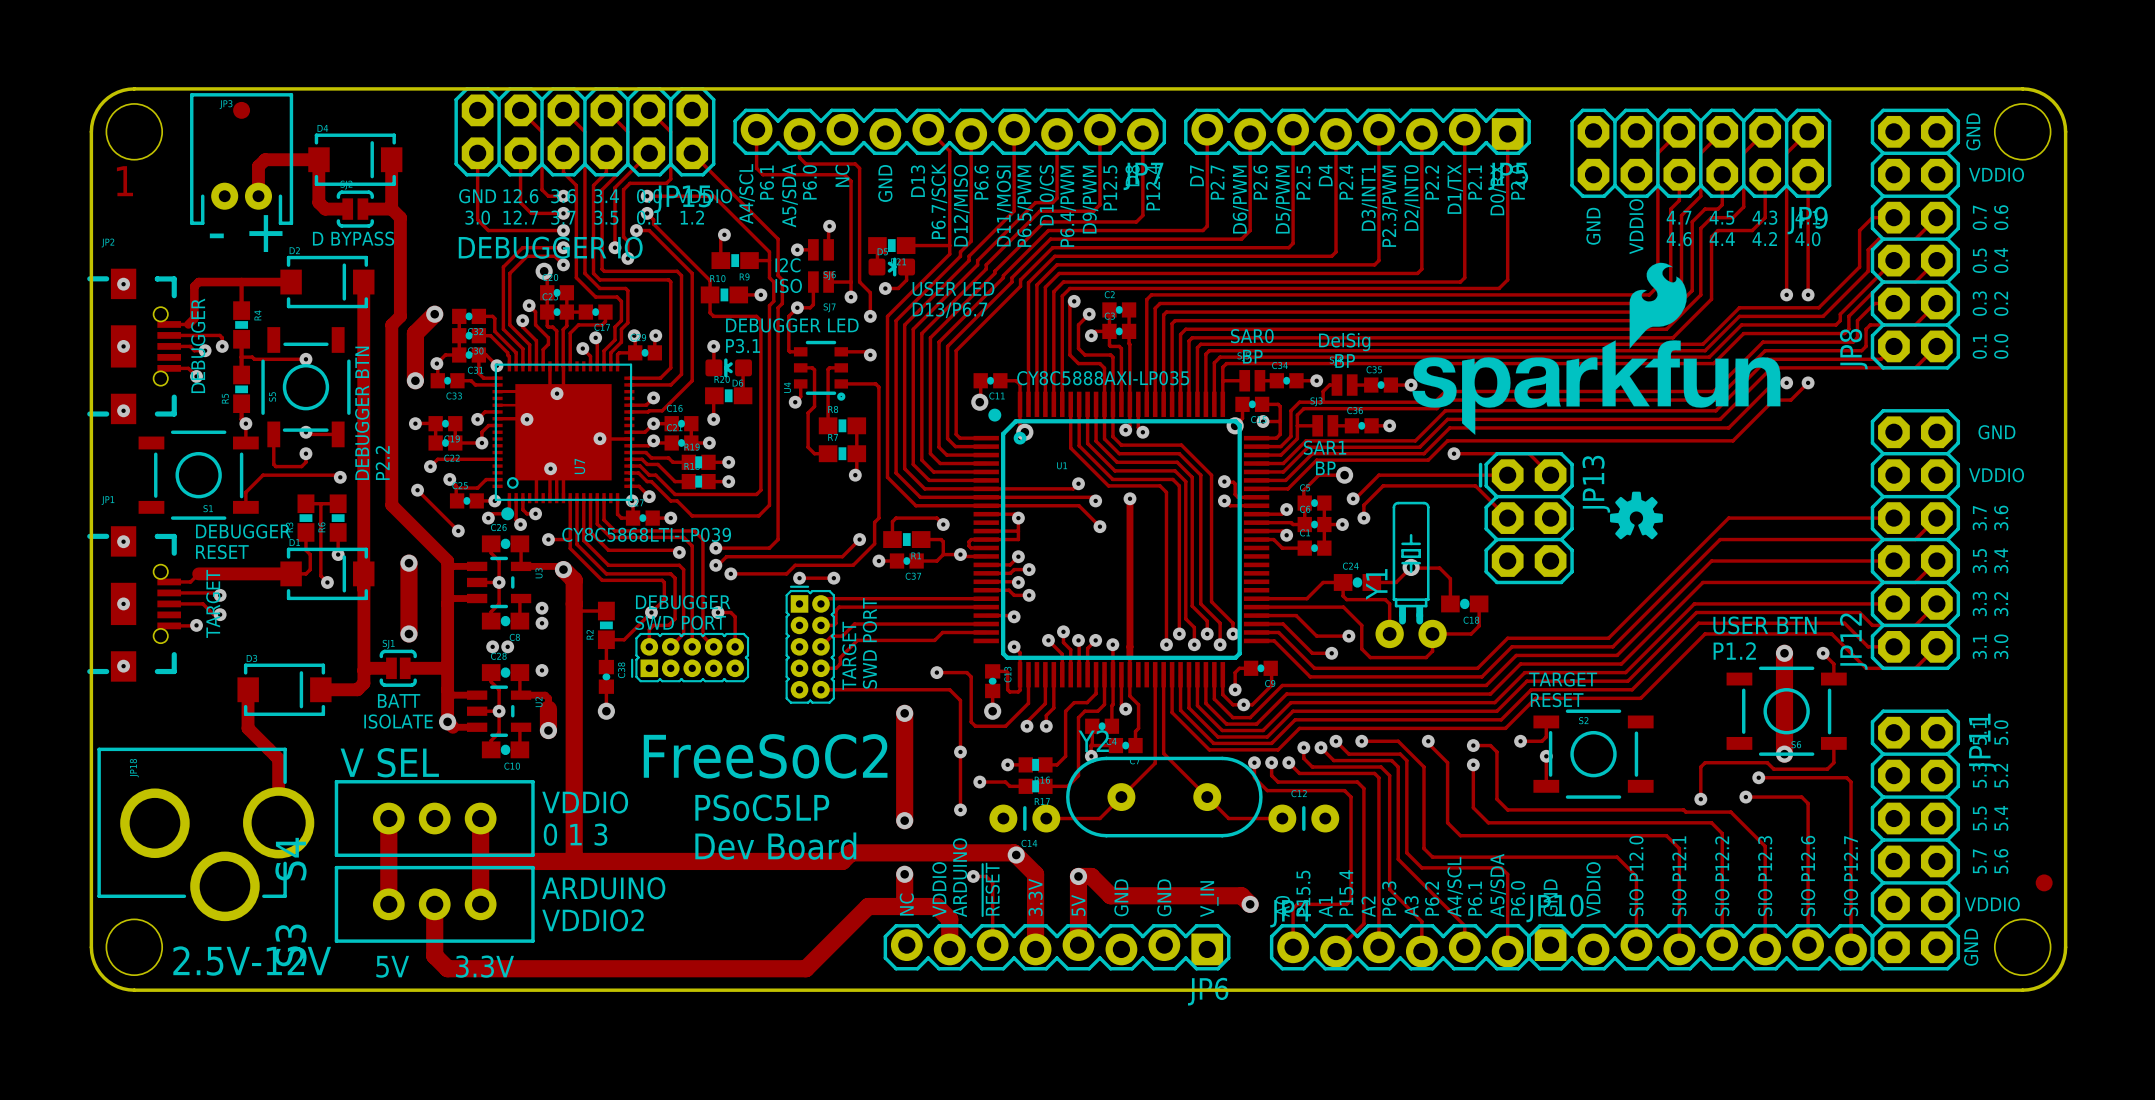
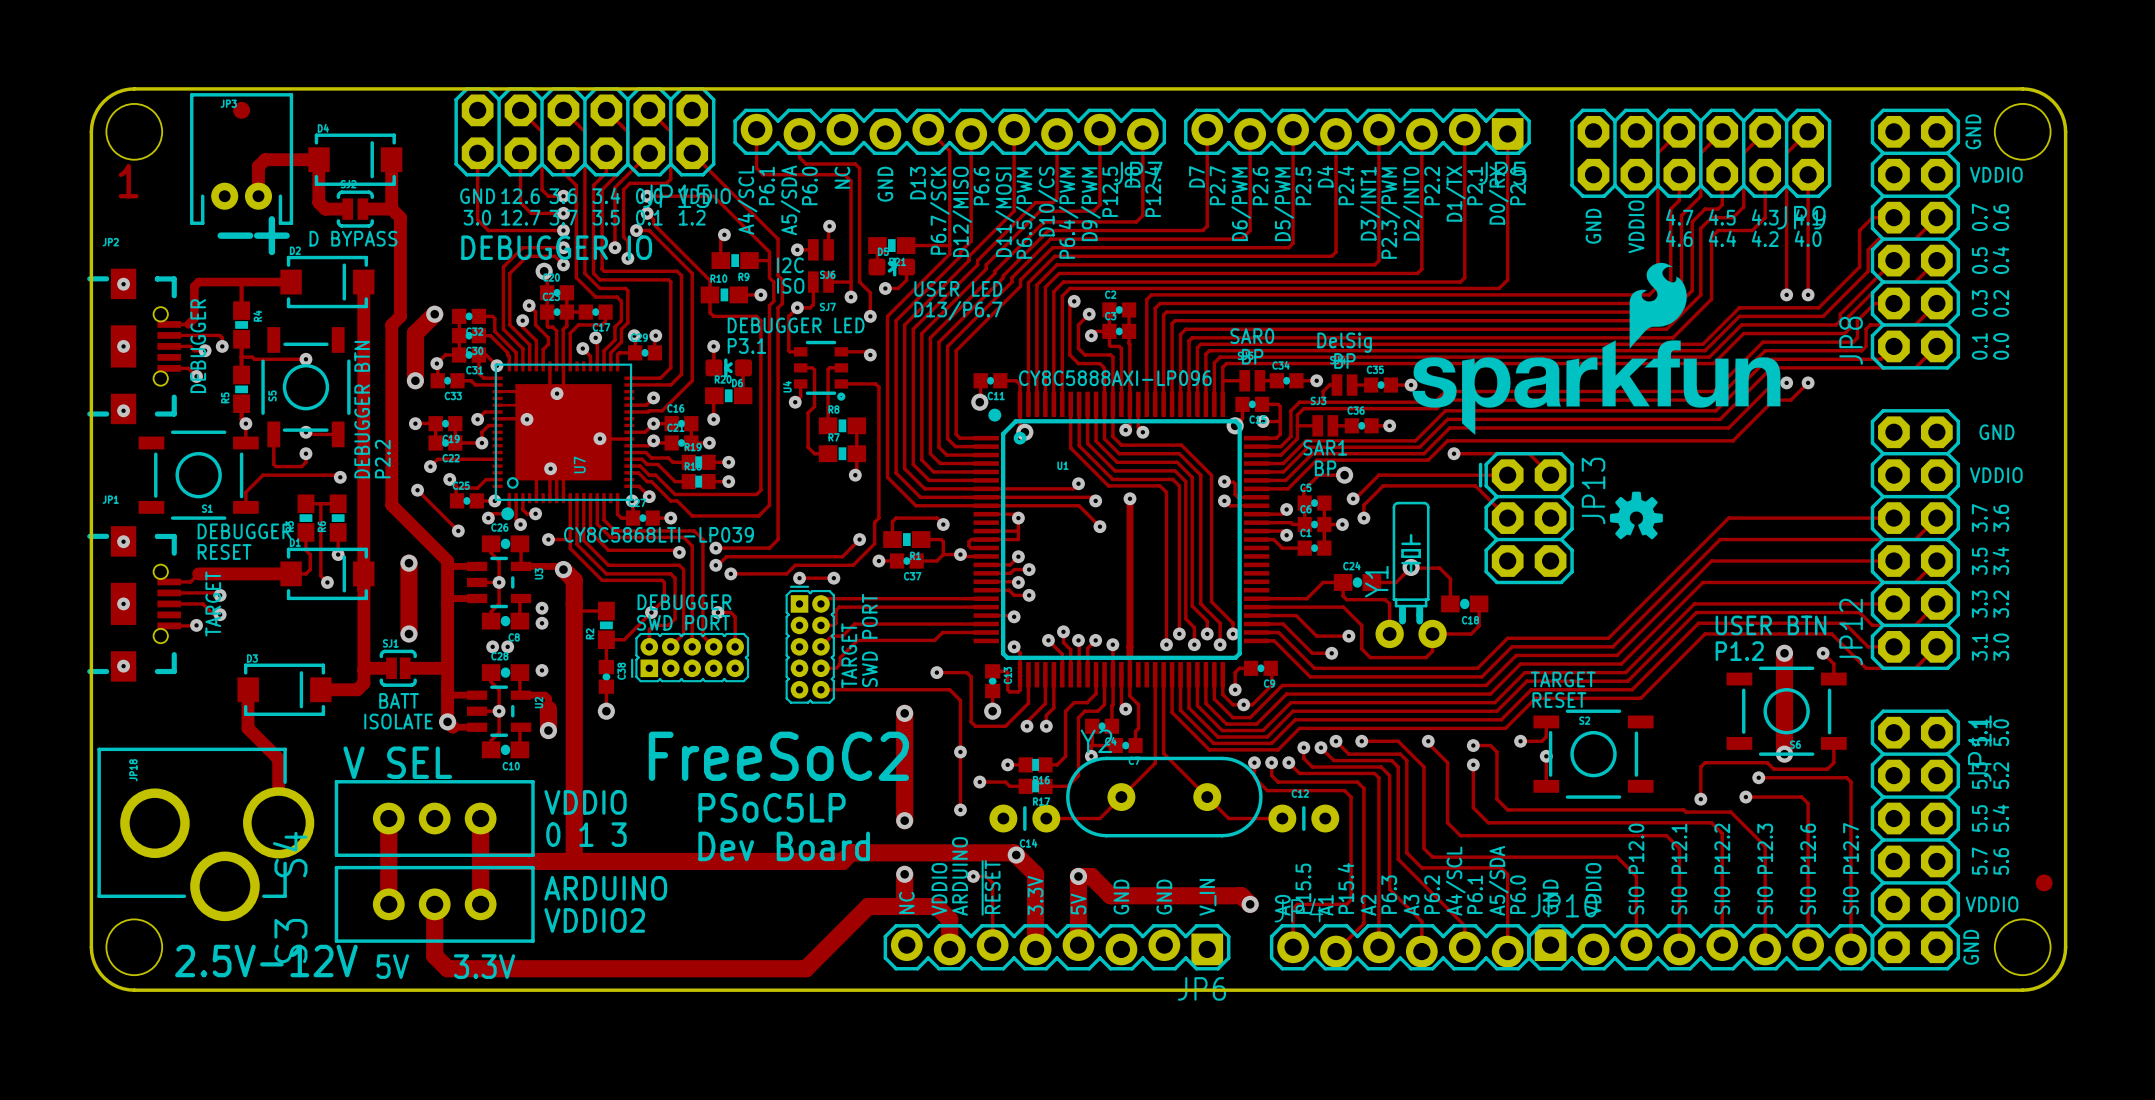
text: CY8C5888AXI-LP035 (1103, 378) -> CY8C5888AXI-LP096 (1115, 378)

